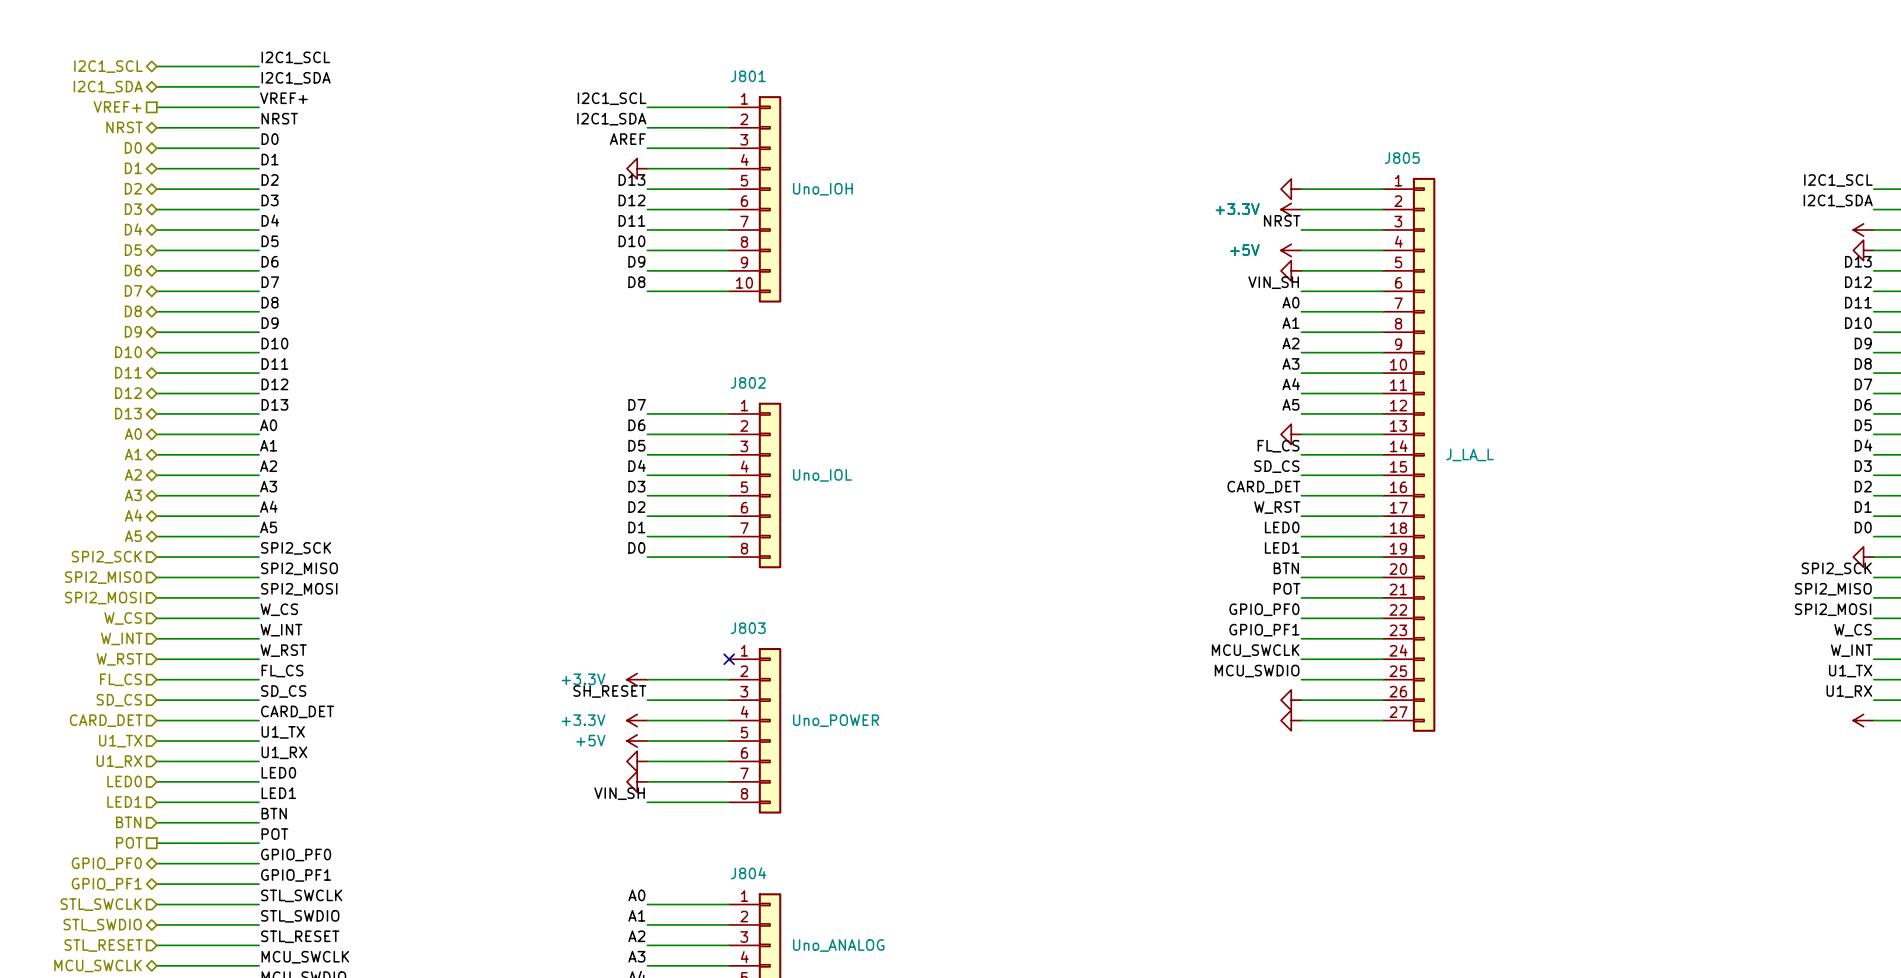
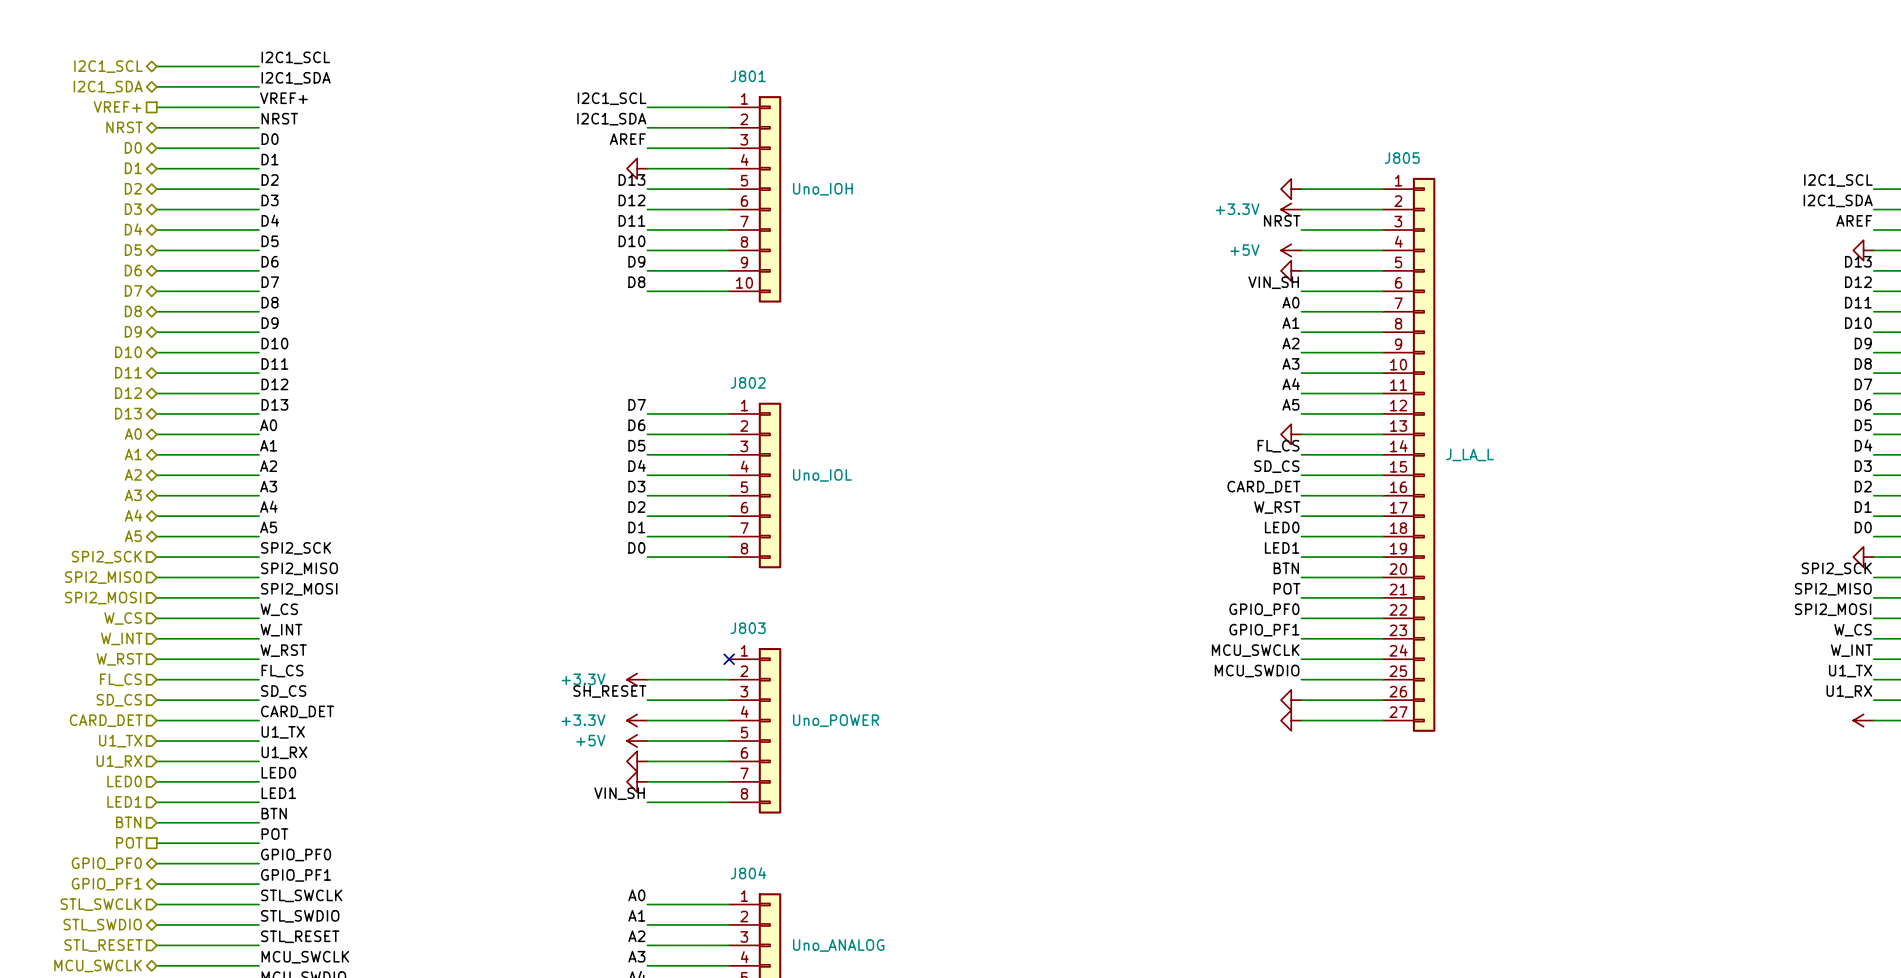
label: none -> AREF (1854, 220)
power symbol: +3.3V (1863, 230) -> none
power symbol text: +5V (1244, 250) -> none

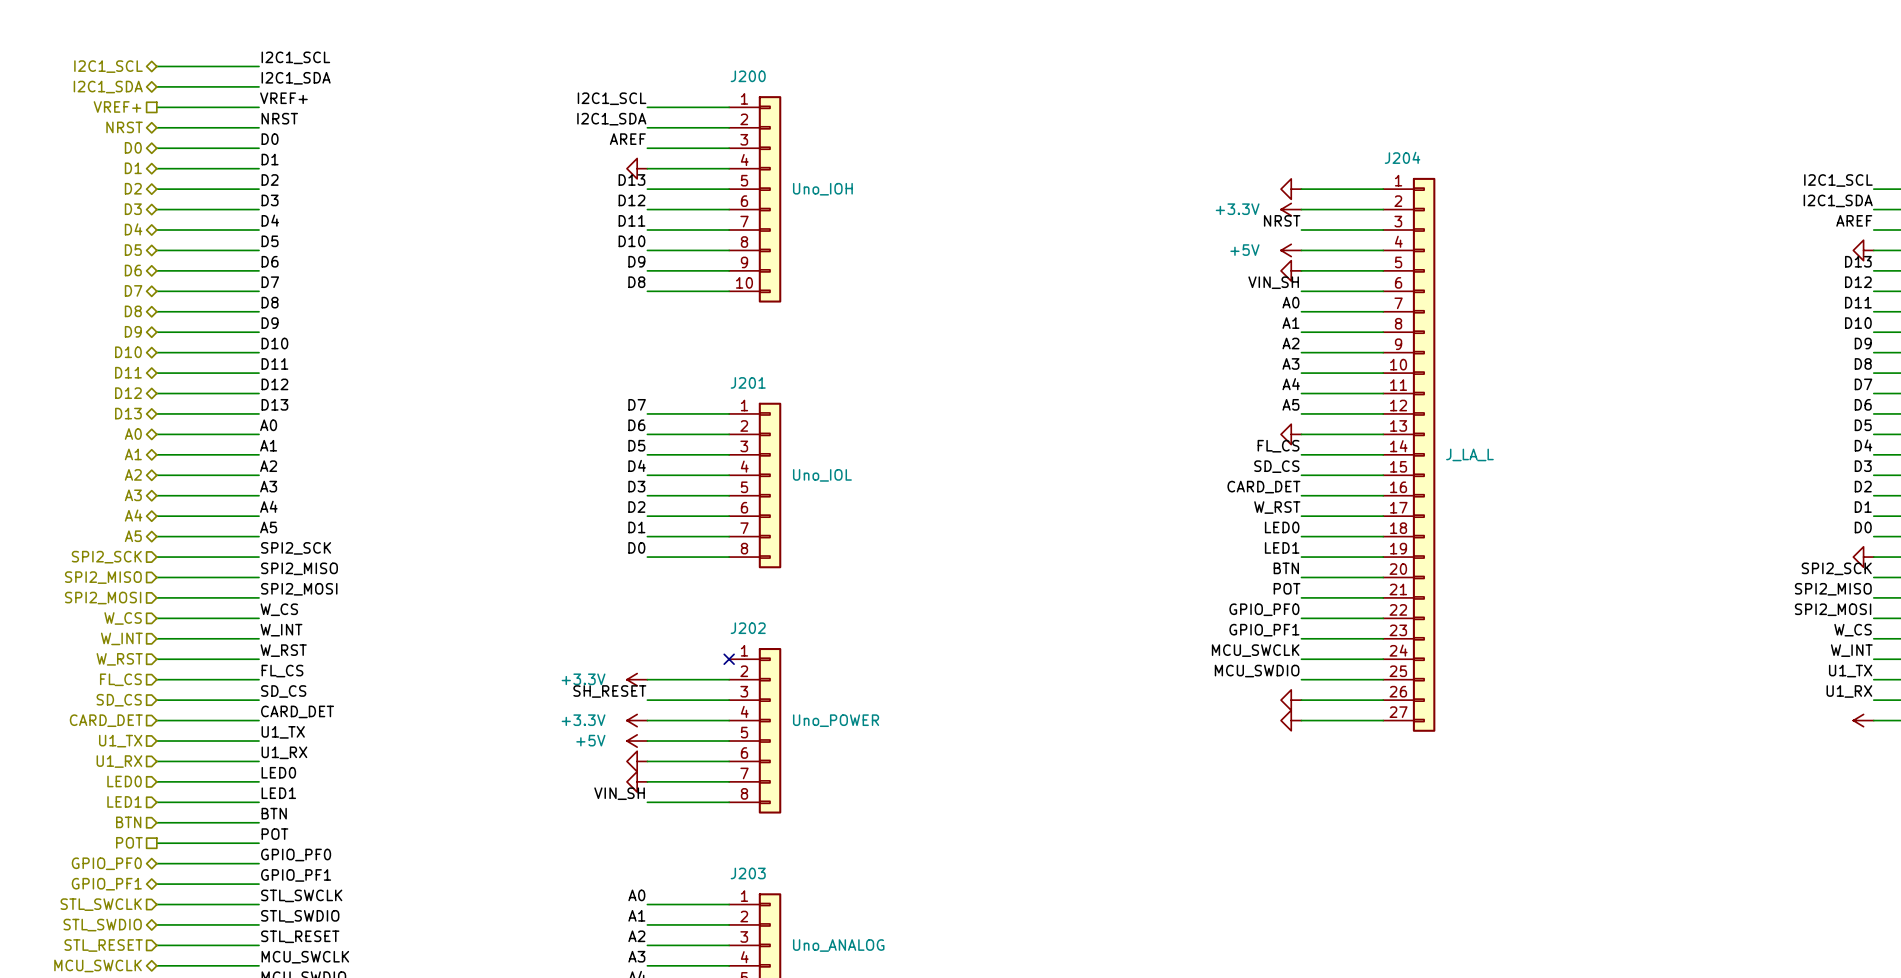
J801 name: J801 (748, 76) -> J200 (748, 76)
J805 name: J805 (1402, 158) -> J204 (1402, 157)
J802 name: J802 (748, 382) -> J201 (748, 382)
J803 name: J803 (748, 628) -> J202 (748, 628)
J804 name: J804 (748, 873) -> J203 (748, 873)

